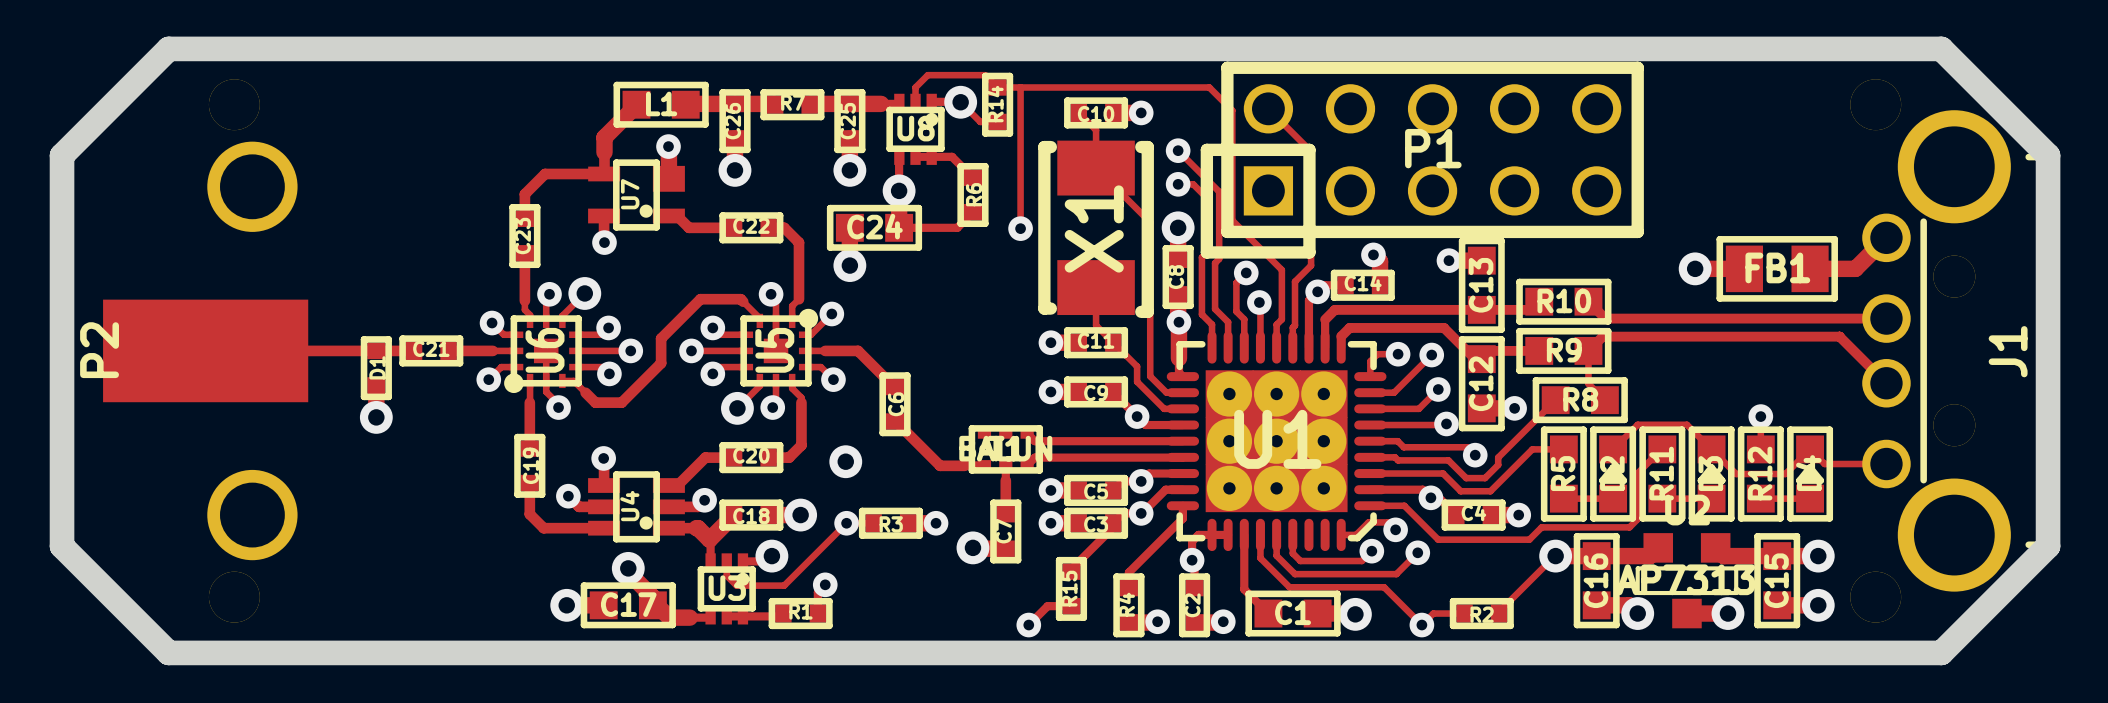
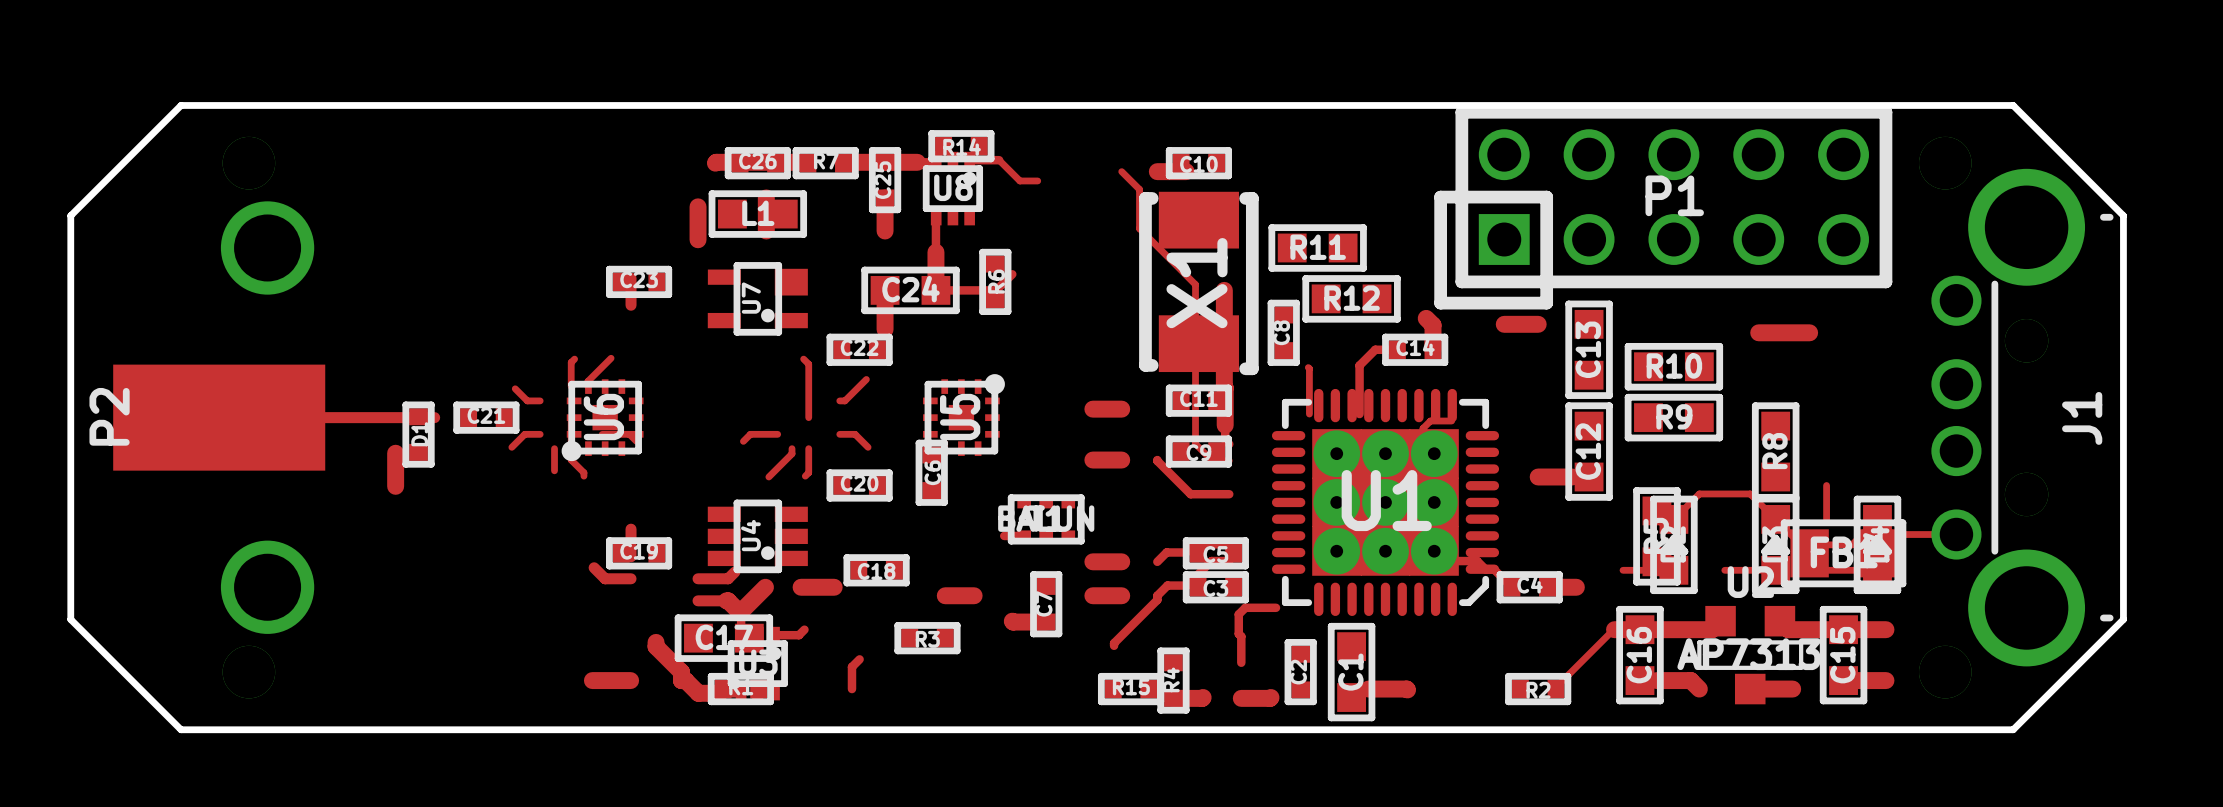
board edge width: thick (168, 48) (1941, 48) (2048, 155) (2048, 546) (1941, 652) (168, 652) (62, 546) (62, 155) (168, 48) -> thin (181, 105) (2013, 105) (2123, 215) (2123, 619) (2013, 729) (181, 729) (70, 619) (70, 215) (181, 105)
track: (1020, 87) (1020, 228) -> none
track: (915, 101) (915, 87) (927, 75) (985, 75) (997, 87) (1209, 87) (1232, 110) (1232, 220) (1281, 270) (1281, 319) (1276, 324) (1276, 347) -> none
via: (960, 102) -> none
track: (636, 104) (604, 137) (604, 173) -> none
L1 position: (661, 104) -> (757, 214)
R14 rotation: 0° (997, 104) -> 90° clockwise (961, 146)
R14 position: (997, 104) -> (961, 146)
track: (1268, 108) (1311, 151) (1311, 265) (1295, 281) (1292, 347) -> none
C10 position: (1096, 112) -> (1198, 163)
via: (1141, 112) -> none
C26 rotation: 0° (734, 121) -> 90° clockwise (757, 163)
via: (668, 146) -> none
track: (1178, 150) (1219, 191) (1219, 259) (1215, 263) (1215, 309) (1228, 322) (1228, 347) -> none
via: (1178, 150) -> none
track: (915, 156) (952, 156) (972, 177) -> none
P1 position: (1422, 160) -> (1663, 207)
via: (734, 170) -> none
via: (849, 170) -> none
track: (604, 173) (545, 173) (524, 194) (524, 218) -> none
track: (1178, 184) (1193, 184) (1206, 197) (1206, 253) (1201, 257) (1201, 314) (1212, 324) (1212, 347) -> none
via: (1178, 184) -> none
via: (899, 190) -> none
U7 position: (636, 194) -> (757, 298)
R6 position: (972, 194) -> (995, 281)
track: (668, 216) (677, 216) (689, 227) (734, 227) -> none
C22 position: (751, 227) -> (859, 349)
track: (768, 227) (784, 227) (798, 242) (798, 299) (792, 306) (792, 320) -> none
via: (1178, 227) -> none
via: (1020, 228) -> none
X1 position: (1096, 229) -> (1198, 283)
C23 rotation: 0° (524, 236) -> 90° clockwise (639, 281)
C23 position: (524, 236) -> (639, 281)
track: (1886, 237) (1855, 268) (1810, 268) -> none
via: (604, 242) -> none
track: (524, 253) (524, 309) (530, 315) (530, 320) -> none
via: (1373, 254) -> none
via: (1448, 260) -> none
via: (849, 265) -> none
via: (1695, 268) -> none
FB1 position: (1777, 268) -> (1843, 553)
track: (1246, 272) (1236, 282) (1236, 311) (1244, 319) (1244, 347) -> none
via: (1246, 272) -> none
C8 position: (1178, 277) -> (1283, 332)
C13 position: (1481, 285) -> (1589, 349)
track: (1096, 287) (1096, 325) (1137, 366) (1137, 381) (1164, 408) (1182, 408) -> none
via: (1317, 291) -> none
via: (584, 293) -> none
via: (549, 294) -> none
via: (771, 294) -> none
track: (1539, 301) (1531, 309) (1334, 309) (1325, 319) (1325, 347) -> none
R10 position: (1563, 301) -> (1673, 366)
track: (1588, 301) (1605, 318) (1886, 318) -> none
via: (1259, 302) -> none
via: (831, 313) -> none
track: (759, 320) (759, 318) (740, 299) (700, 299) (661, 338) (661, 363) (621, 402) (595, 402) (573, 380) (562, 380) -> none
via: (1178, 322) -> none
via: (492, 323) -> none
track: (608, 327) (601, 334) (576, 334) -> none
via: (608, 327) -> none
track: (712, 327) (719, 334) (745, 334) -> none
via: (712, 327) -> none
via: (1050, 342) -> none
C11 position: (1096, 342) -> (1198, 400)
track: (1341, 347) (1341, 336) (1349, 327) (1444, 327) (1475, 359) (1481, 359) (1490, 350) (1539, 350) -> none
U5 position: (778, 348) -> (963, 415)
C21 position: (431, 350) -> (486, 417)
track: (448, 350) (516, 350) -> none
track: (576, 350) (630, 350) -> none
via: (630, 350) -> none
track: (691, 350) (745, 350) -> none
via: (691, 350) -> none
track: (806, 350) (858, 350) (895, 387) -> none
R9 position: (1563, 350) -> (1673, 417)
U6 position: (543, 353) -> (602, 420)
via: (1398, 354) -> none
track: (1431, 355) (1394, 392) (1370, 392) -> none
via: (1431, 355) -> none
D1 position: (376, 368) -> (418, 434)
via: (609, 373) -> none
via: (712, 373) -> none
via: (488, 379) -> none
via: (833, 379) -> none
track: (792, 380) (792, 388) (801, 397) (801, 445) (789, 457) (768, 457) -> none
C12 position: (1481, 383) -> (1589, 451)
track: (1886, 383) (1839, 336) (1602, 336) (1588, 350) (1588, 383) (1604, 400) -> none
track: (1438, 389) (1418, 408) (1370, 408) -> none
via: (1438, 389) -> none
via: (1050, 391) -> none
C9 position: (1096, 391) -> (1198, 451)
track: (1555, 400) (1498, 457) (1498, 464) (1485, 478) (1466, 478) (1448, 460) (1398, 460) (1395, 457) (1370, 457) -> none
R8 rotation: 0° (1580, 400) -> 90° clockwise (1775, 451)
R8 position: (1580, 400) -> (1775, 451)
track: (529, 402) (529, 448) -> none
via: (558, 407) -> none
via: (772, 407) -> none
via: (737, 408) -> none
via: (1514, 408) -> none
via: (1137, 416) -> none
via: (1760, 416) -> none
via: (376, 417) -> none
track: (895, 421) (940, 465) (964, 465) -> none
track: (1446, 423) (1370, 425) -> none
via: (1446, 423) -> none
track: (1027, 433) (1034, 441) (1182, 441) -> none
U1 position: (1276, 441) -> (1385, 502)
track: (1370, 441) (1397, 441) (1403, 447) (1467, 447) (1475, 455) -> none
track: (1563, 449) (1532, 449) (1490, 491) (1460, 491) (1443, 473) (1370, 473) -> none
track: (1662, 449) (1637, 473) (1637, 519) (1629, 527) (1541, 527) (1529, 539) (1438, 539) (1404, 505) (1370, 505) -> none
via: (1475, 455) -> none
track: (734, 457) (705, 457) (677, 485) (668, 485) -> none
C20 position: (751, 457) -> (859, 485)
track: (1182, 457) (1034, 457) (1027, 465) -> none
via: (603, 458) -> none
via: (845, 461) -> none
C19 rotation: 0° (529, 465) -> 90° clockwise (639, 553)
C19 position: (529, 465) -> (639, 553)
track: (1005, 465) (1005, 514) -> none
R5 position: (1563, 474) -> (1656, 536)
R11 rotation: 0° (1662, 474) -> 90° clockwise (1317, 247)
R11 position: (1662, 474) -> (1317, 247)
R12 rotation: 0° (1760, 474) -> 90° clockwise (1351, 298)
R12 position: (1760, 474) -> (1351, 298)
via: (1141, 481) -> none
track: (529, 483) (529, 514) (543, 528) (604, 528) -> none
via: (1050, 490) -> none
C5 position: (1096, 490) -> (1215, 553)
via: (568, 496) -> none
via: (1430, 497) -> none
via: (704, 500) -> none
track: (1182, 505) (1182, 518) (1128, 572) (1128, 588) -> none
U4 position: (636, 506) -> (757, 536)
via: (1141, 513) -> none
C18 position: (751, 515) -> (876, 570)
via: (800, 515) -> none
via: (1518, 515) -> none
via: (846, 523) -> none
track: (873, 523) (846, 523) (784, 585) (736, 585) (726, 575) (726, 561) -> none
R3 position: (890, 523) -> (927, 638)
via: (936, 523) -> none
via: (1050, 523) -> none
C3 position: (1096, 523) -> (1215, 587)
track: (1395, 529) (1388, 522) (1368, 522) (1356, 534) (1341, 534) -> none
via: (1395, 529) -> none
track: (1244, 534) (1244, 589) (1268, 613) -> none
track: (1260, 534) (1260, 558) (1289, 587) (1384, 587) (1421, 625) (1433, 613) (1464, 613) -> none
track: (1276, 534) (1276, 555) (1294, 574) (1396, 574) (1417, 552) -> none
track: (1292, 534) (1292, 553) (1300, 561) (1361, 561) (1371, 551) -> none
via: (972, 547) -> none
via: (1371, 551) -> none
via: (1417, 552) -> none
via: (771, 556) -> none
via: (1555, 556) -> none
via: (1818, 556) -> none
via: (1192, 560) -> none
via: (628, 568) -> none
C16 position: (1596, 580) -> (1639, 655)
via: (825, 584) -> none
R15 rotation: 0° (1071, 588) -> 90° clockwise (1131, 689)
via: (566, 605) -> none
C17 position: (628, 605) -> (723, 638)
C2 position: (1194, 605) -> (1300, 672)
via: (1818, 605) -> none
track: (1071, 606) (1047, 606) (1028, 625) -> none
track: (783, 613) (780, 616) (726, 616) -> none
R1 position: (800, 613) -> (740, 689)
C1 rotation: 0° (1293, 613) -> 90° clockwise (1351, 672)
via: (1637, 613) -> none
via: (1727, 613) -> none
via: (1355, 614) -> none
via: (1157, 621) -> none
via: (1223, 621) -> none
via: (1028, 625) -> none
via: (1421, 625) -> none

